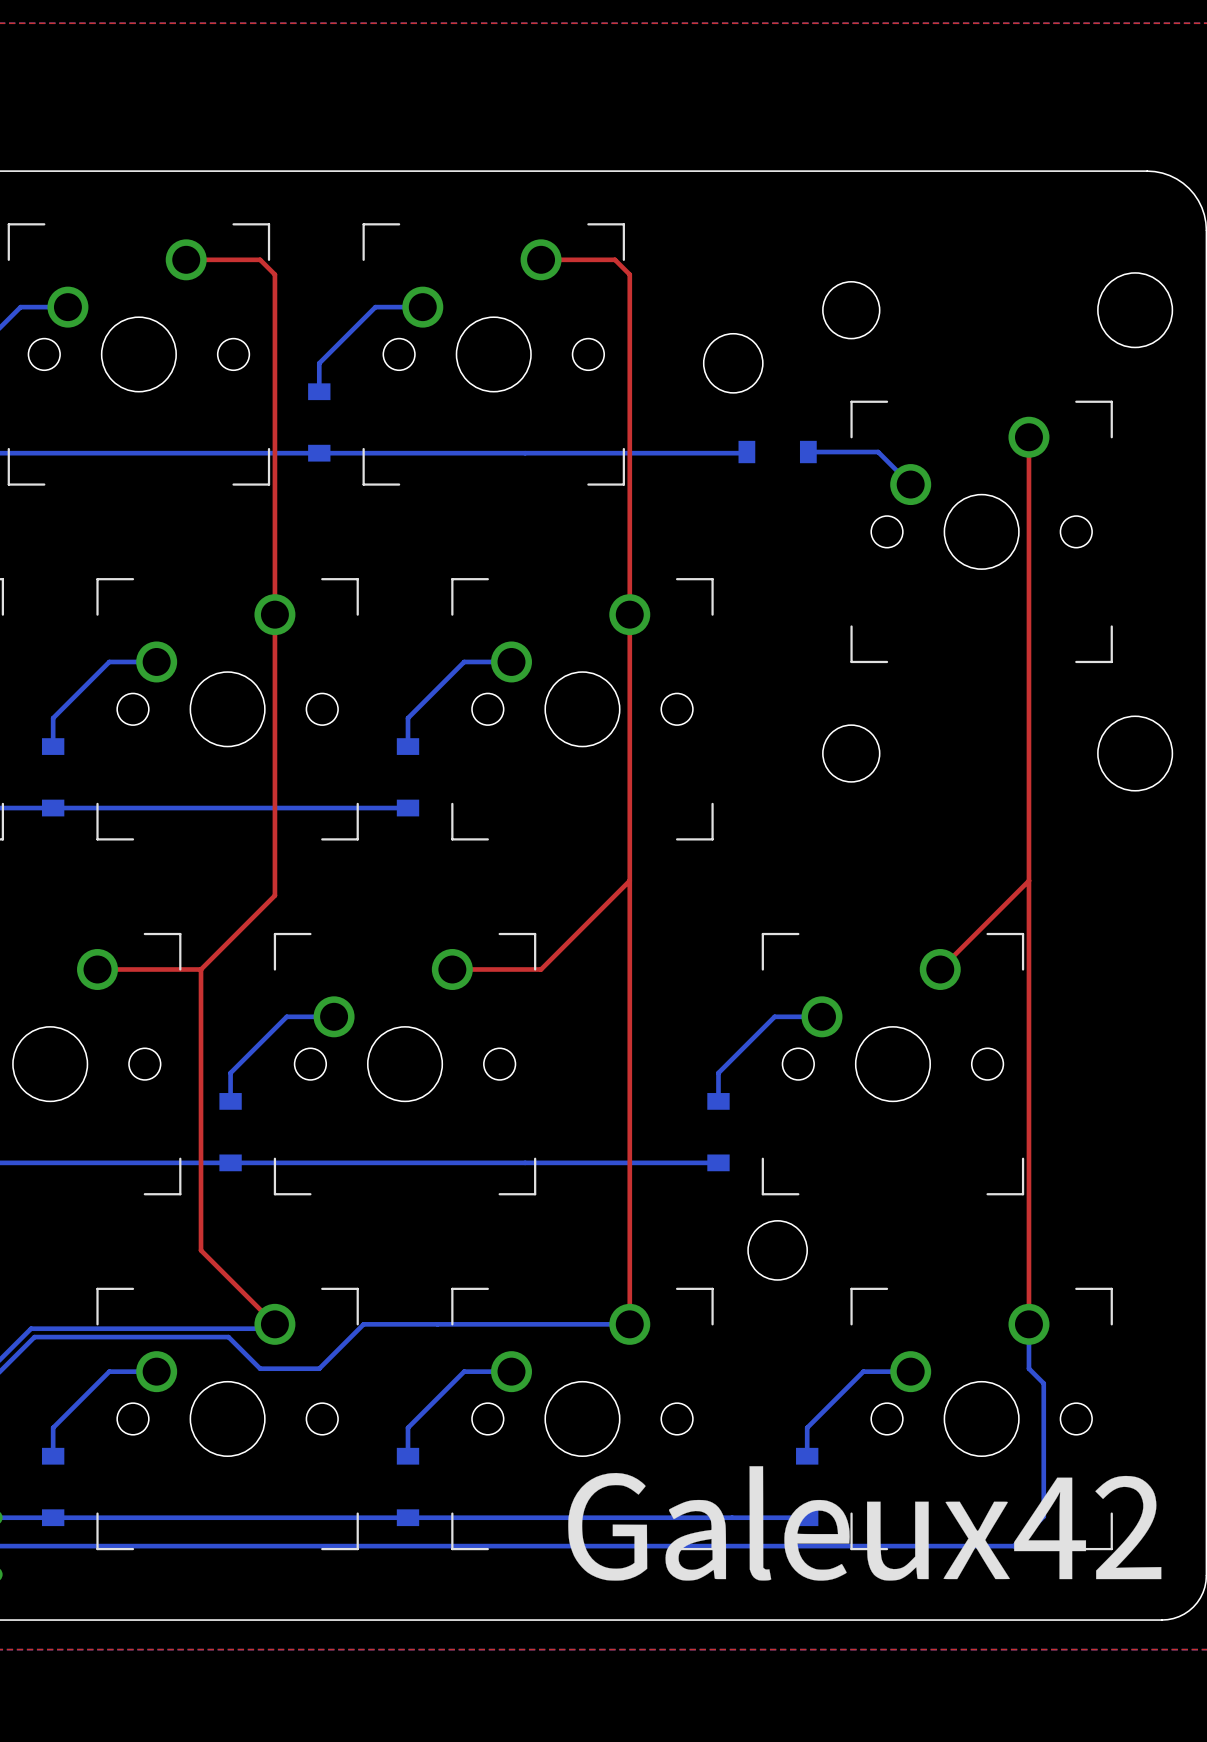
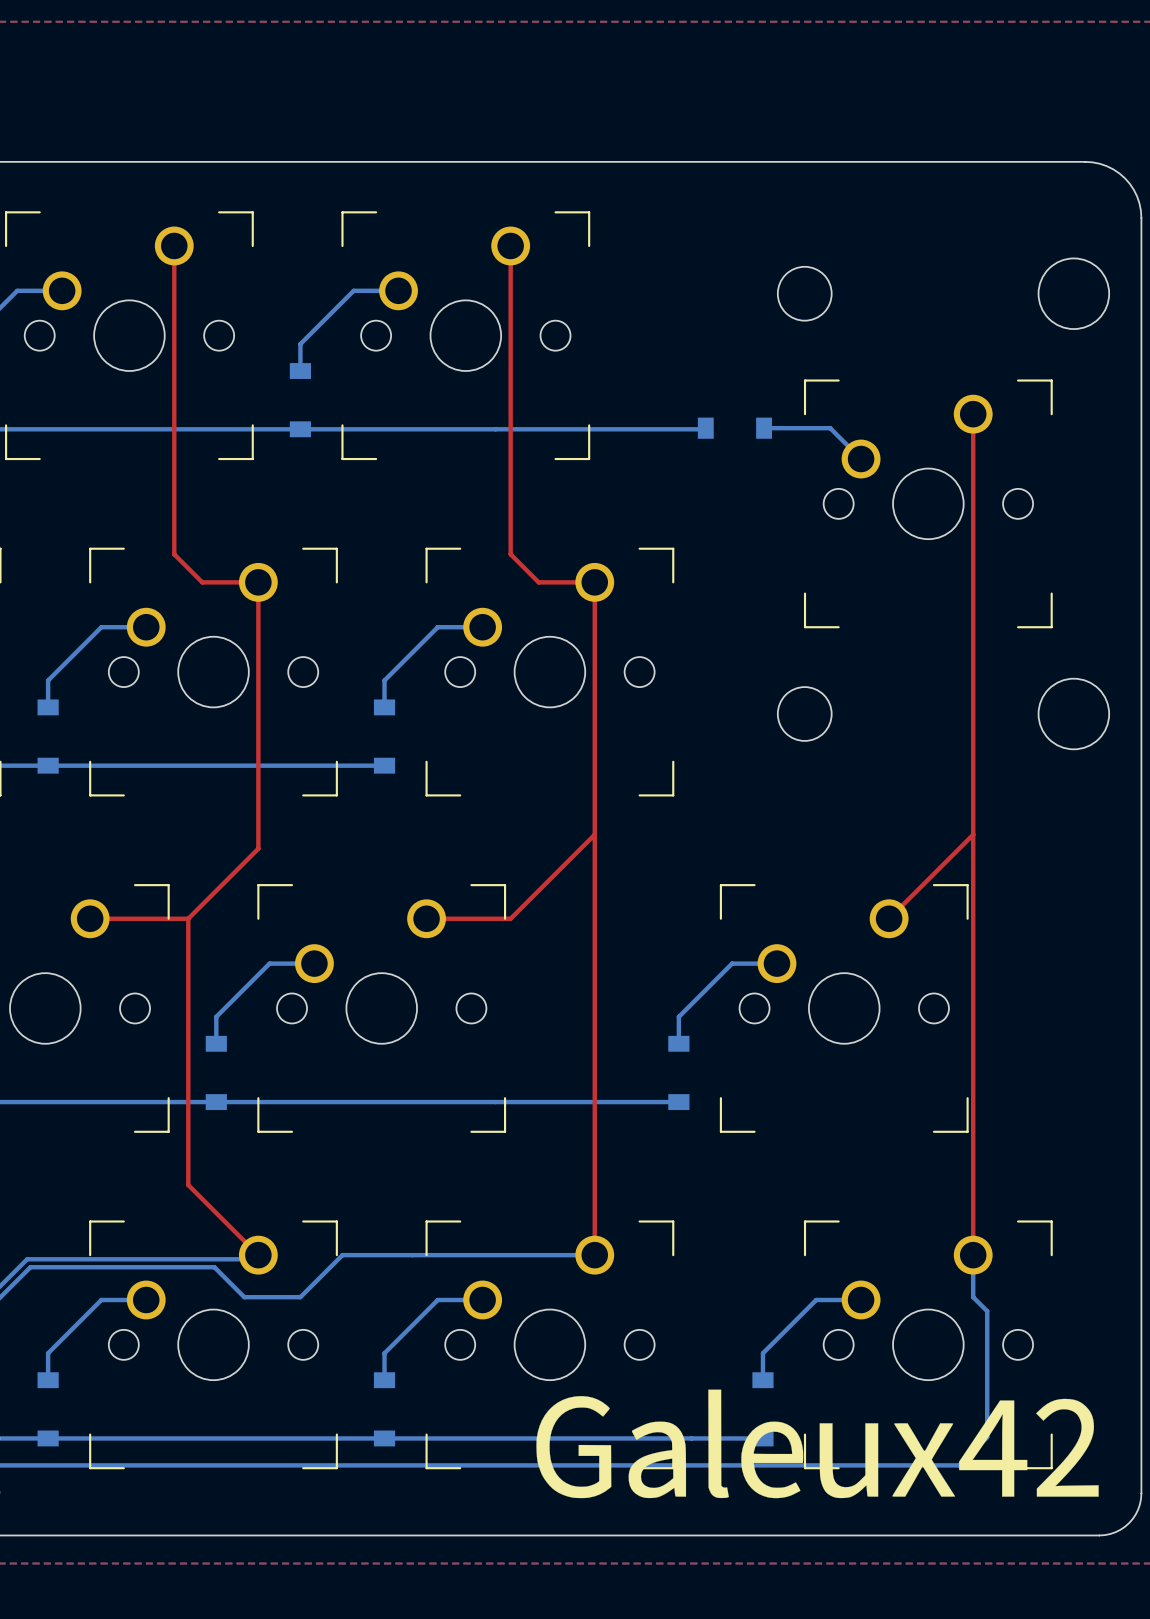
top track: (186, 259) (260, 259) (274, 274) (274, 614) -> (174, 245) (174, 554) (202, 582) (258, 582)
top track: (541, 259) (614, 259) (629, 274) (629, 614) -> (510, 245) (510, 554) (538, 582) (594, 582)
round board edge: [703, 333, 764, 394] -> none
round board edge: [747, 1220, 808, 1281] -> none

